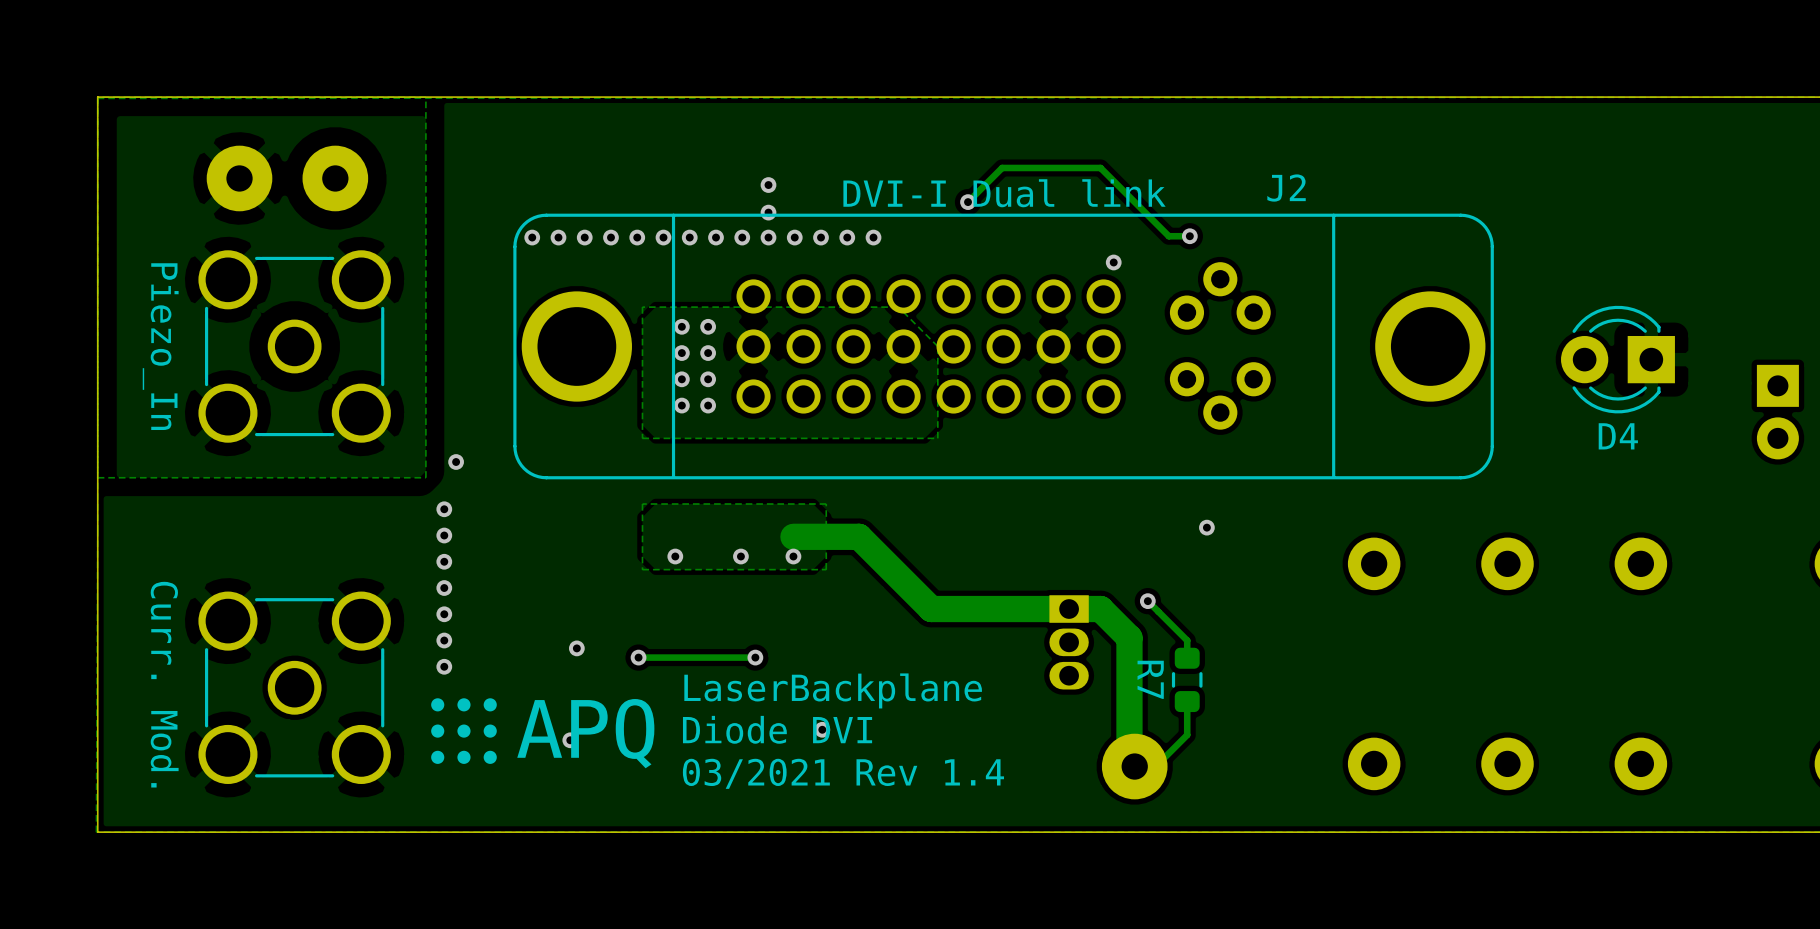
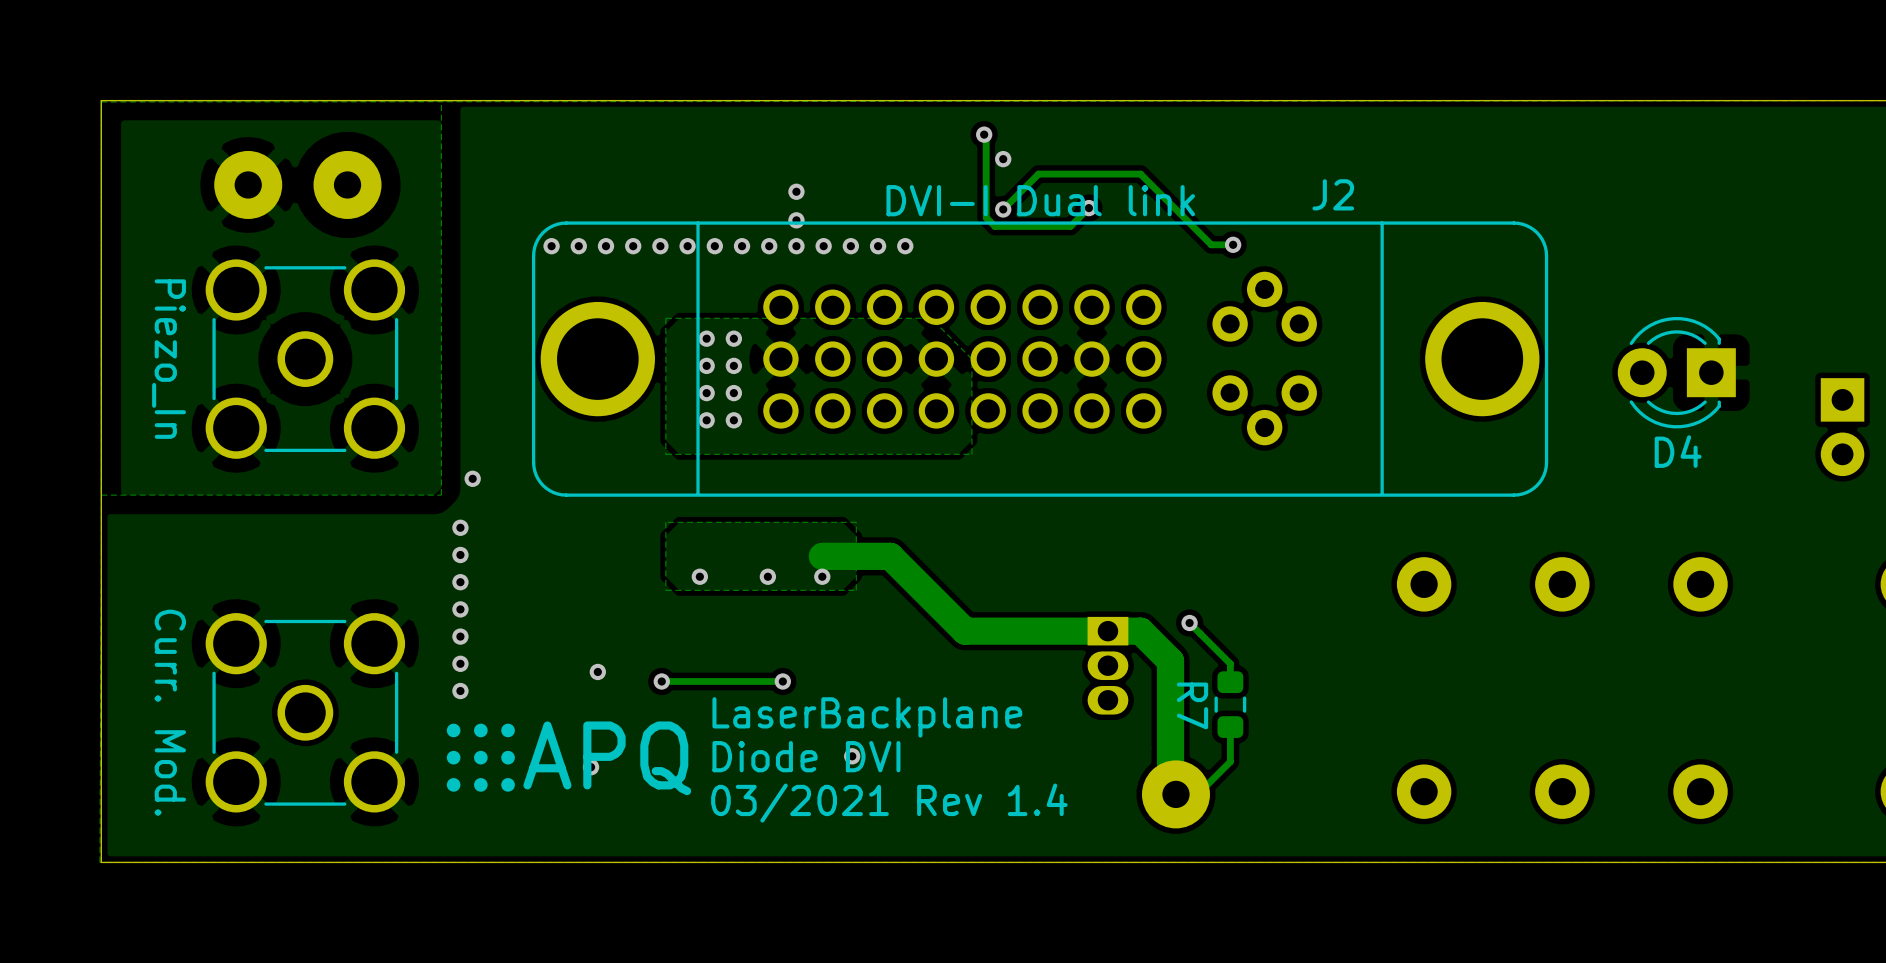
track: none -> (984, 134) (986, 136) (986, 217) (995, 226) (1070, 226) (1088, 208)
via: none -> (984, 134)
via: none -> (1003, 159)
via position: (1113, 262) -> (1088, 208)
via: (1206, 527) -> none

